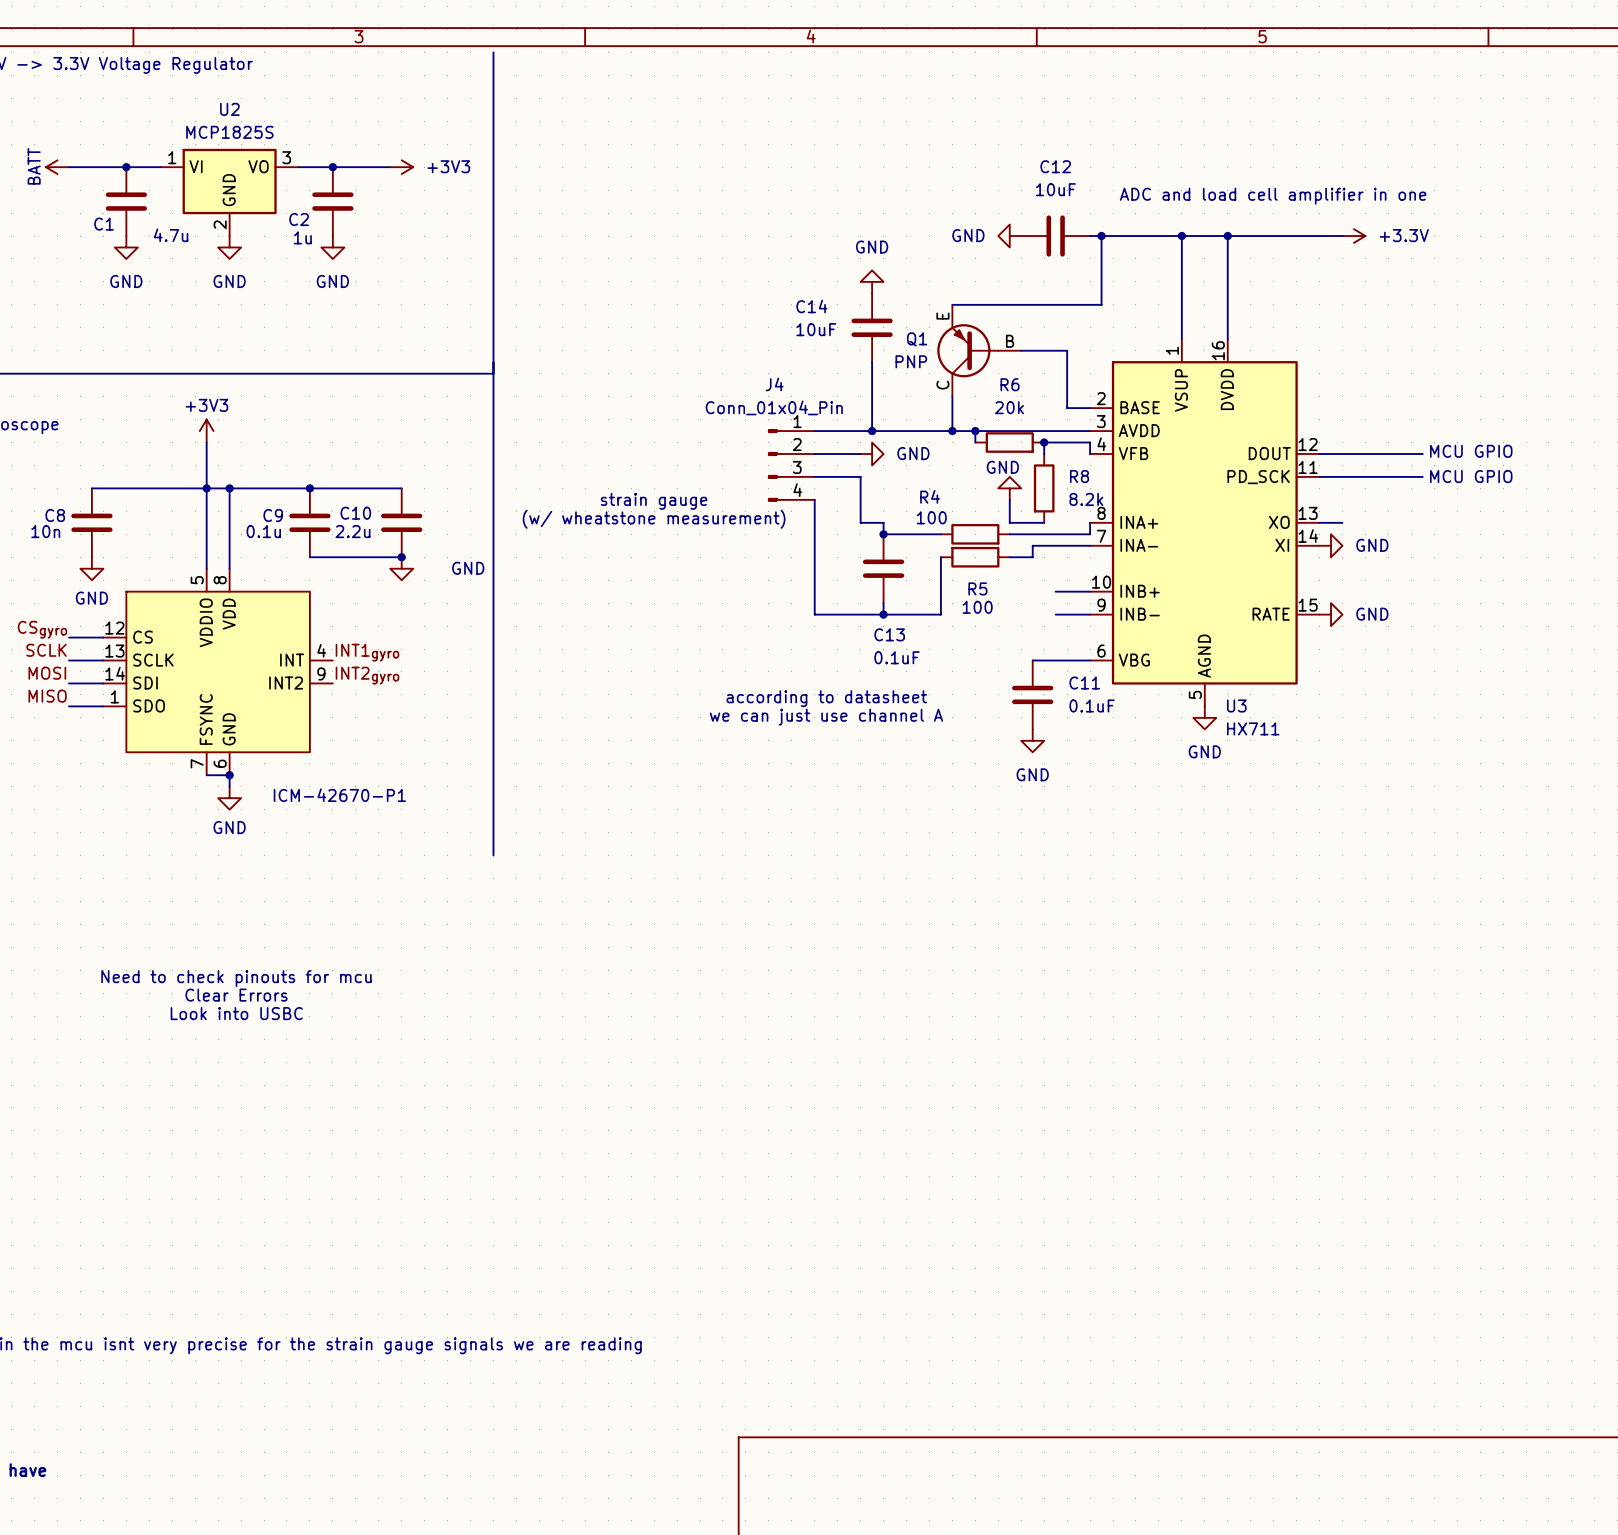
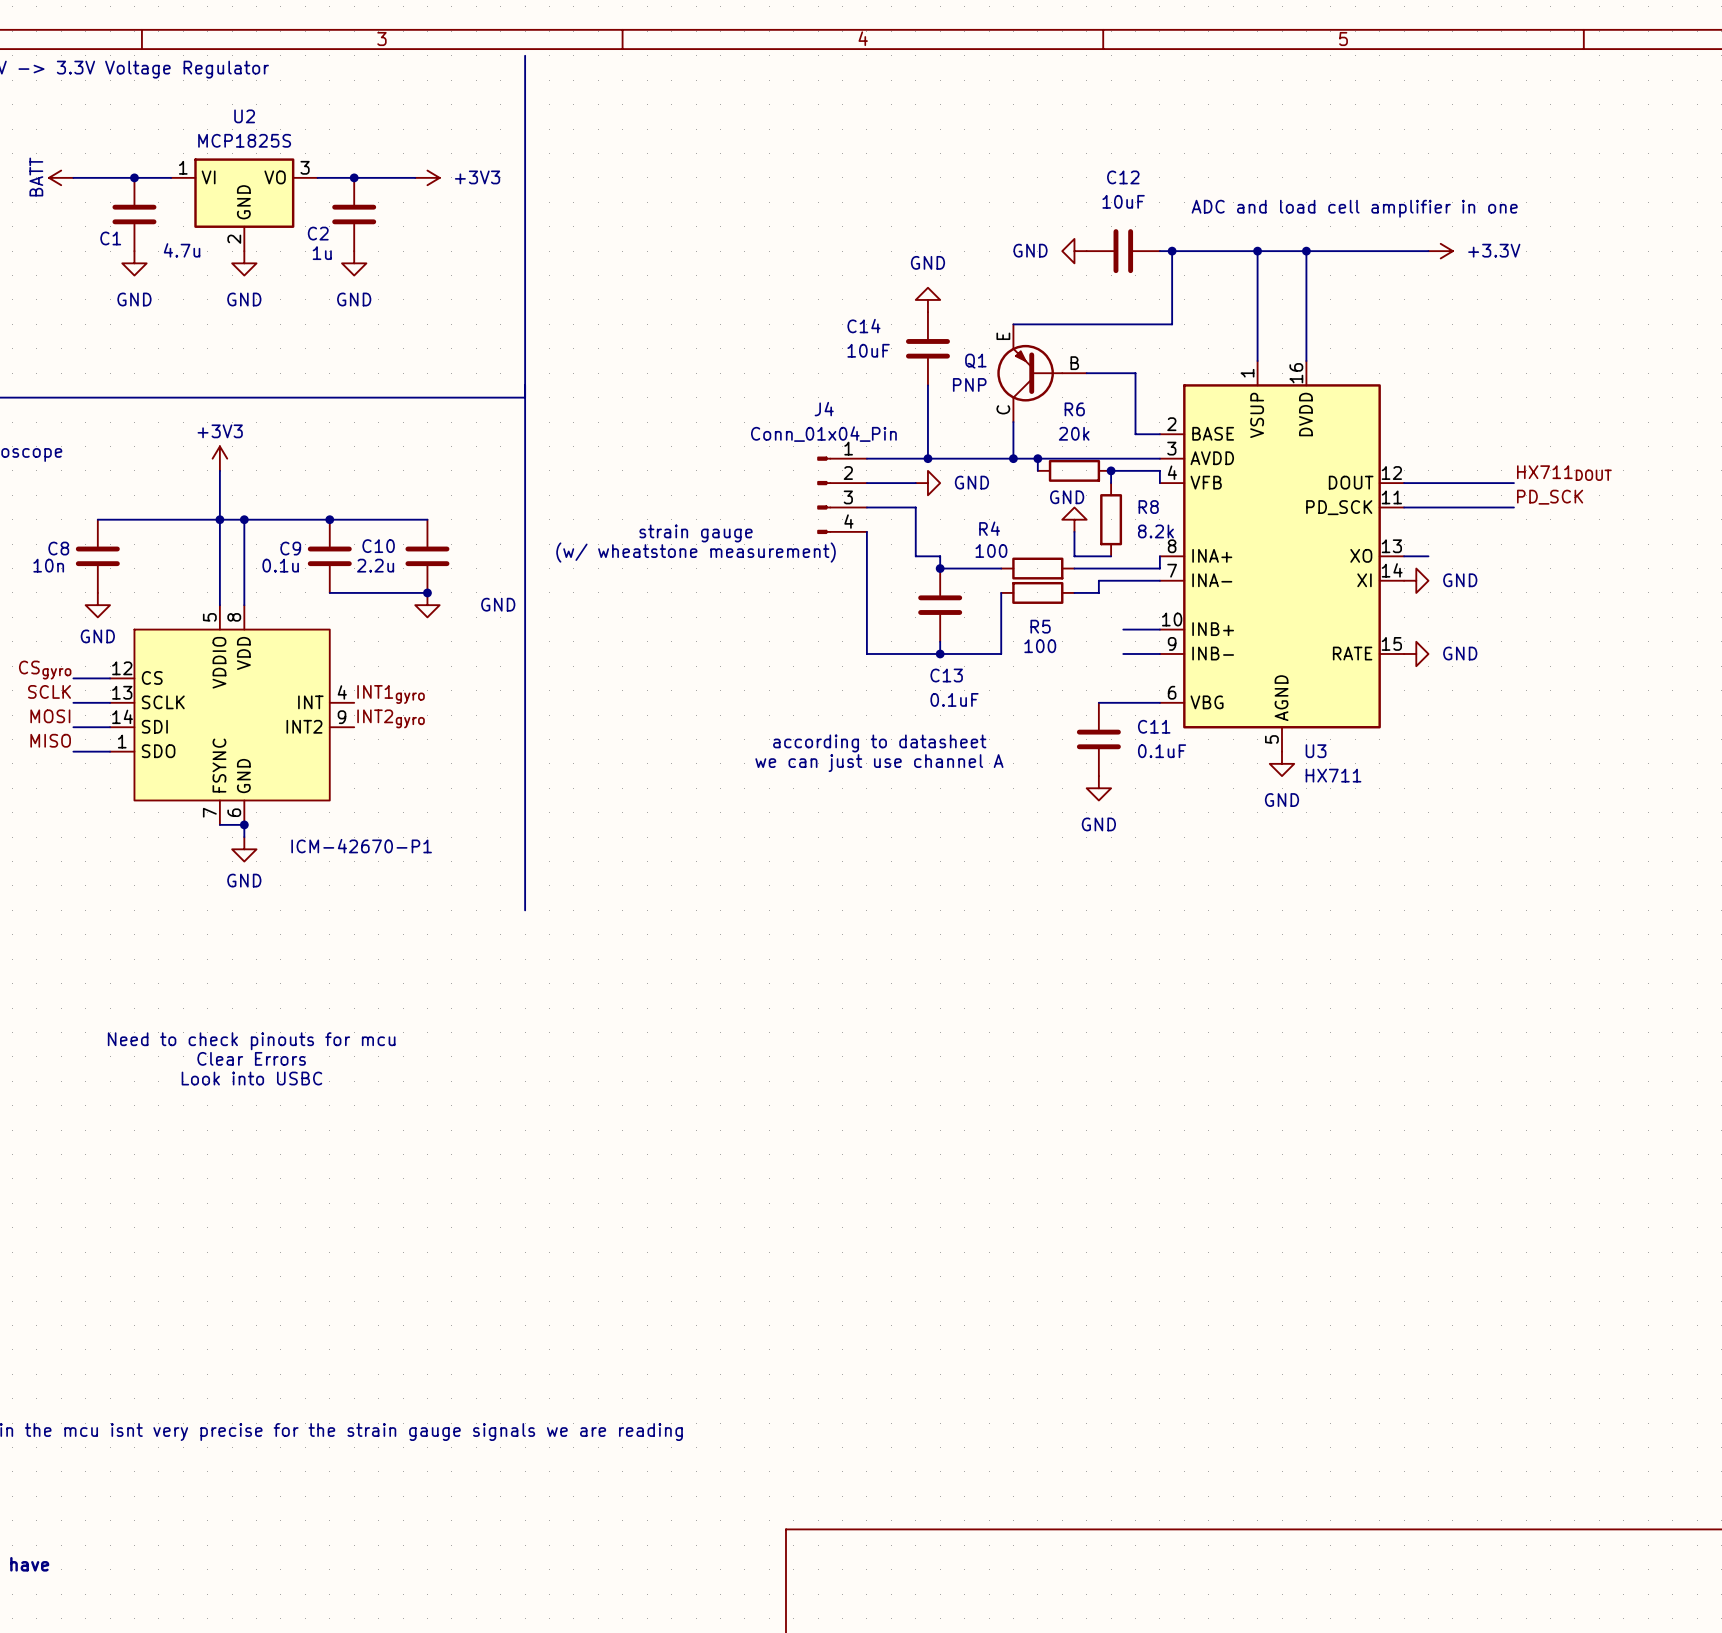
label: none -> HX711DOUT (1564, 473)
text: MCU GPIO (1471, 451) -> none
label: none -> PD_SCK (1550, 497)
text: MCU GPIO (1471, 476) -> none

